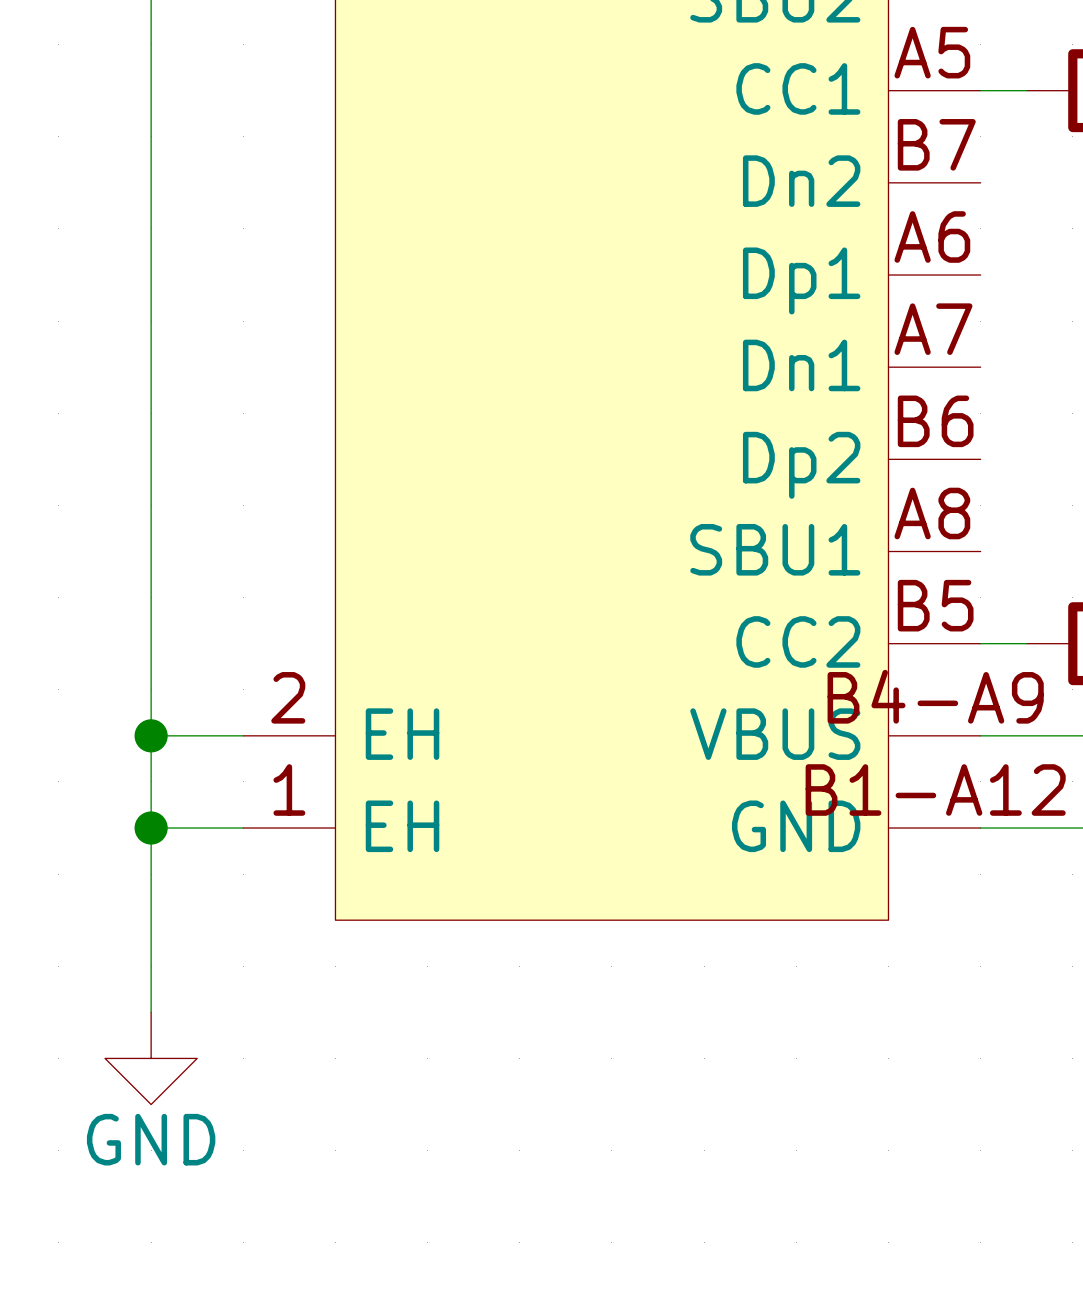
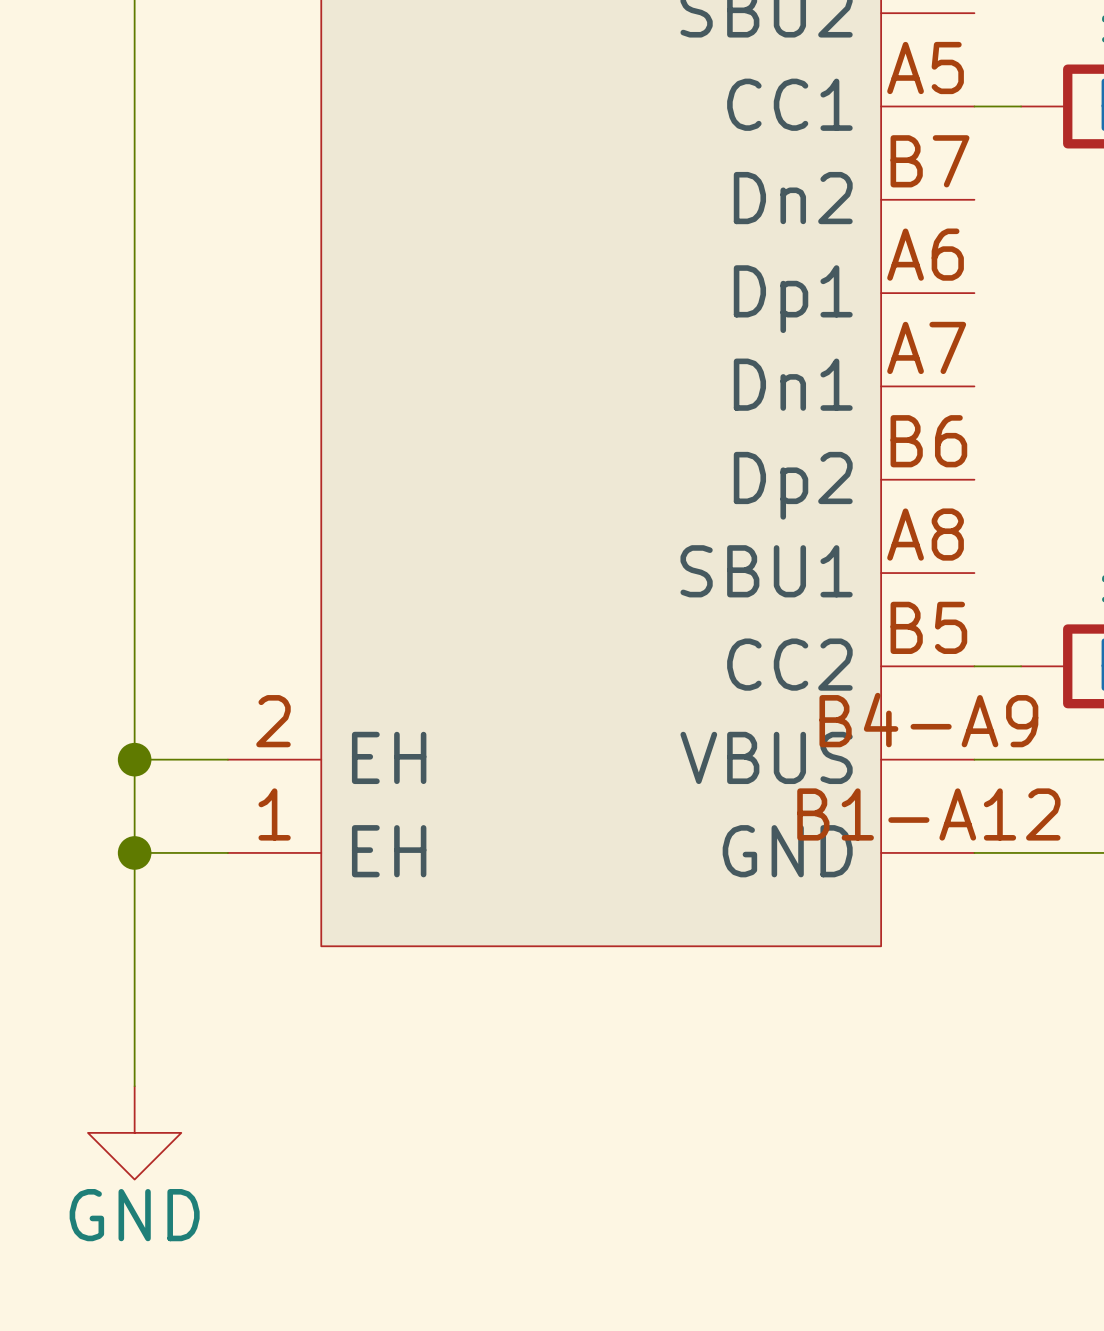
power symbol position: GND (151, 1058) -> GND (134, 1132)

